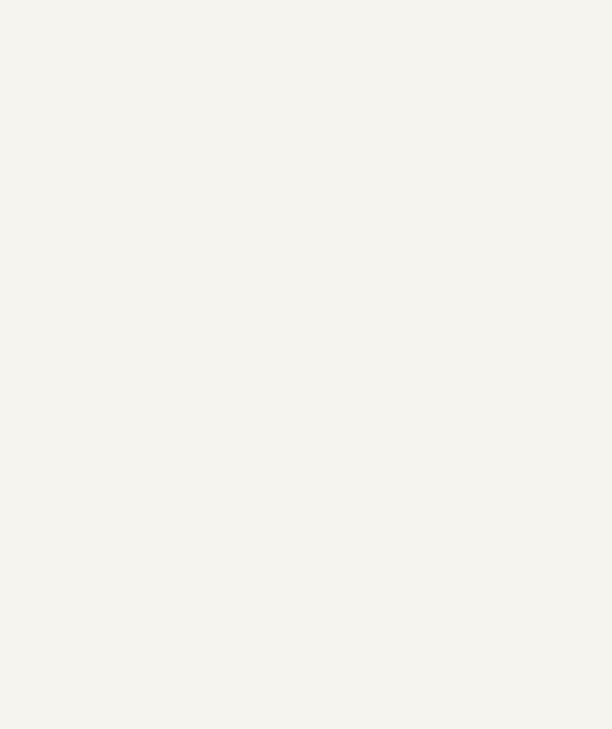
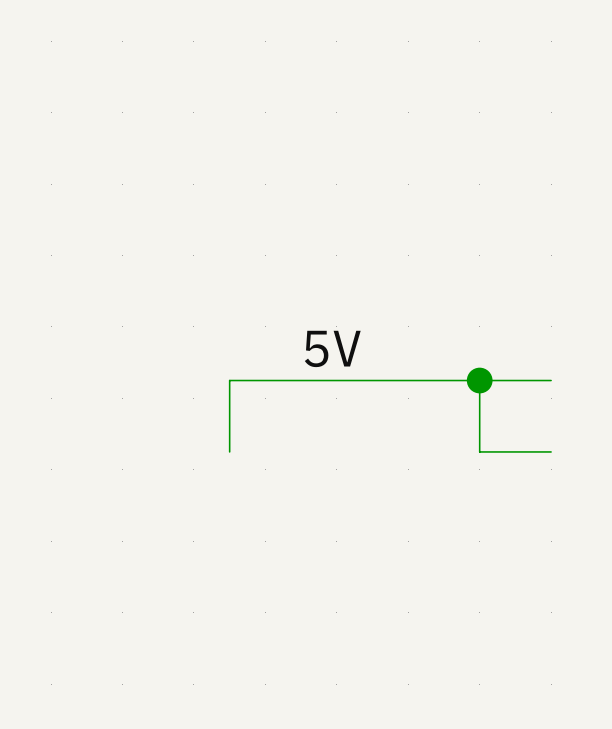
label: none -> 5V (332, 348)
wire: none -> (479, 380) (479, 451) (551, 451)
junction: none -> (479, 380)
wire: none -> (551, 380) (229, 380) (229, 451)

